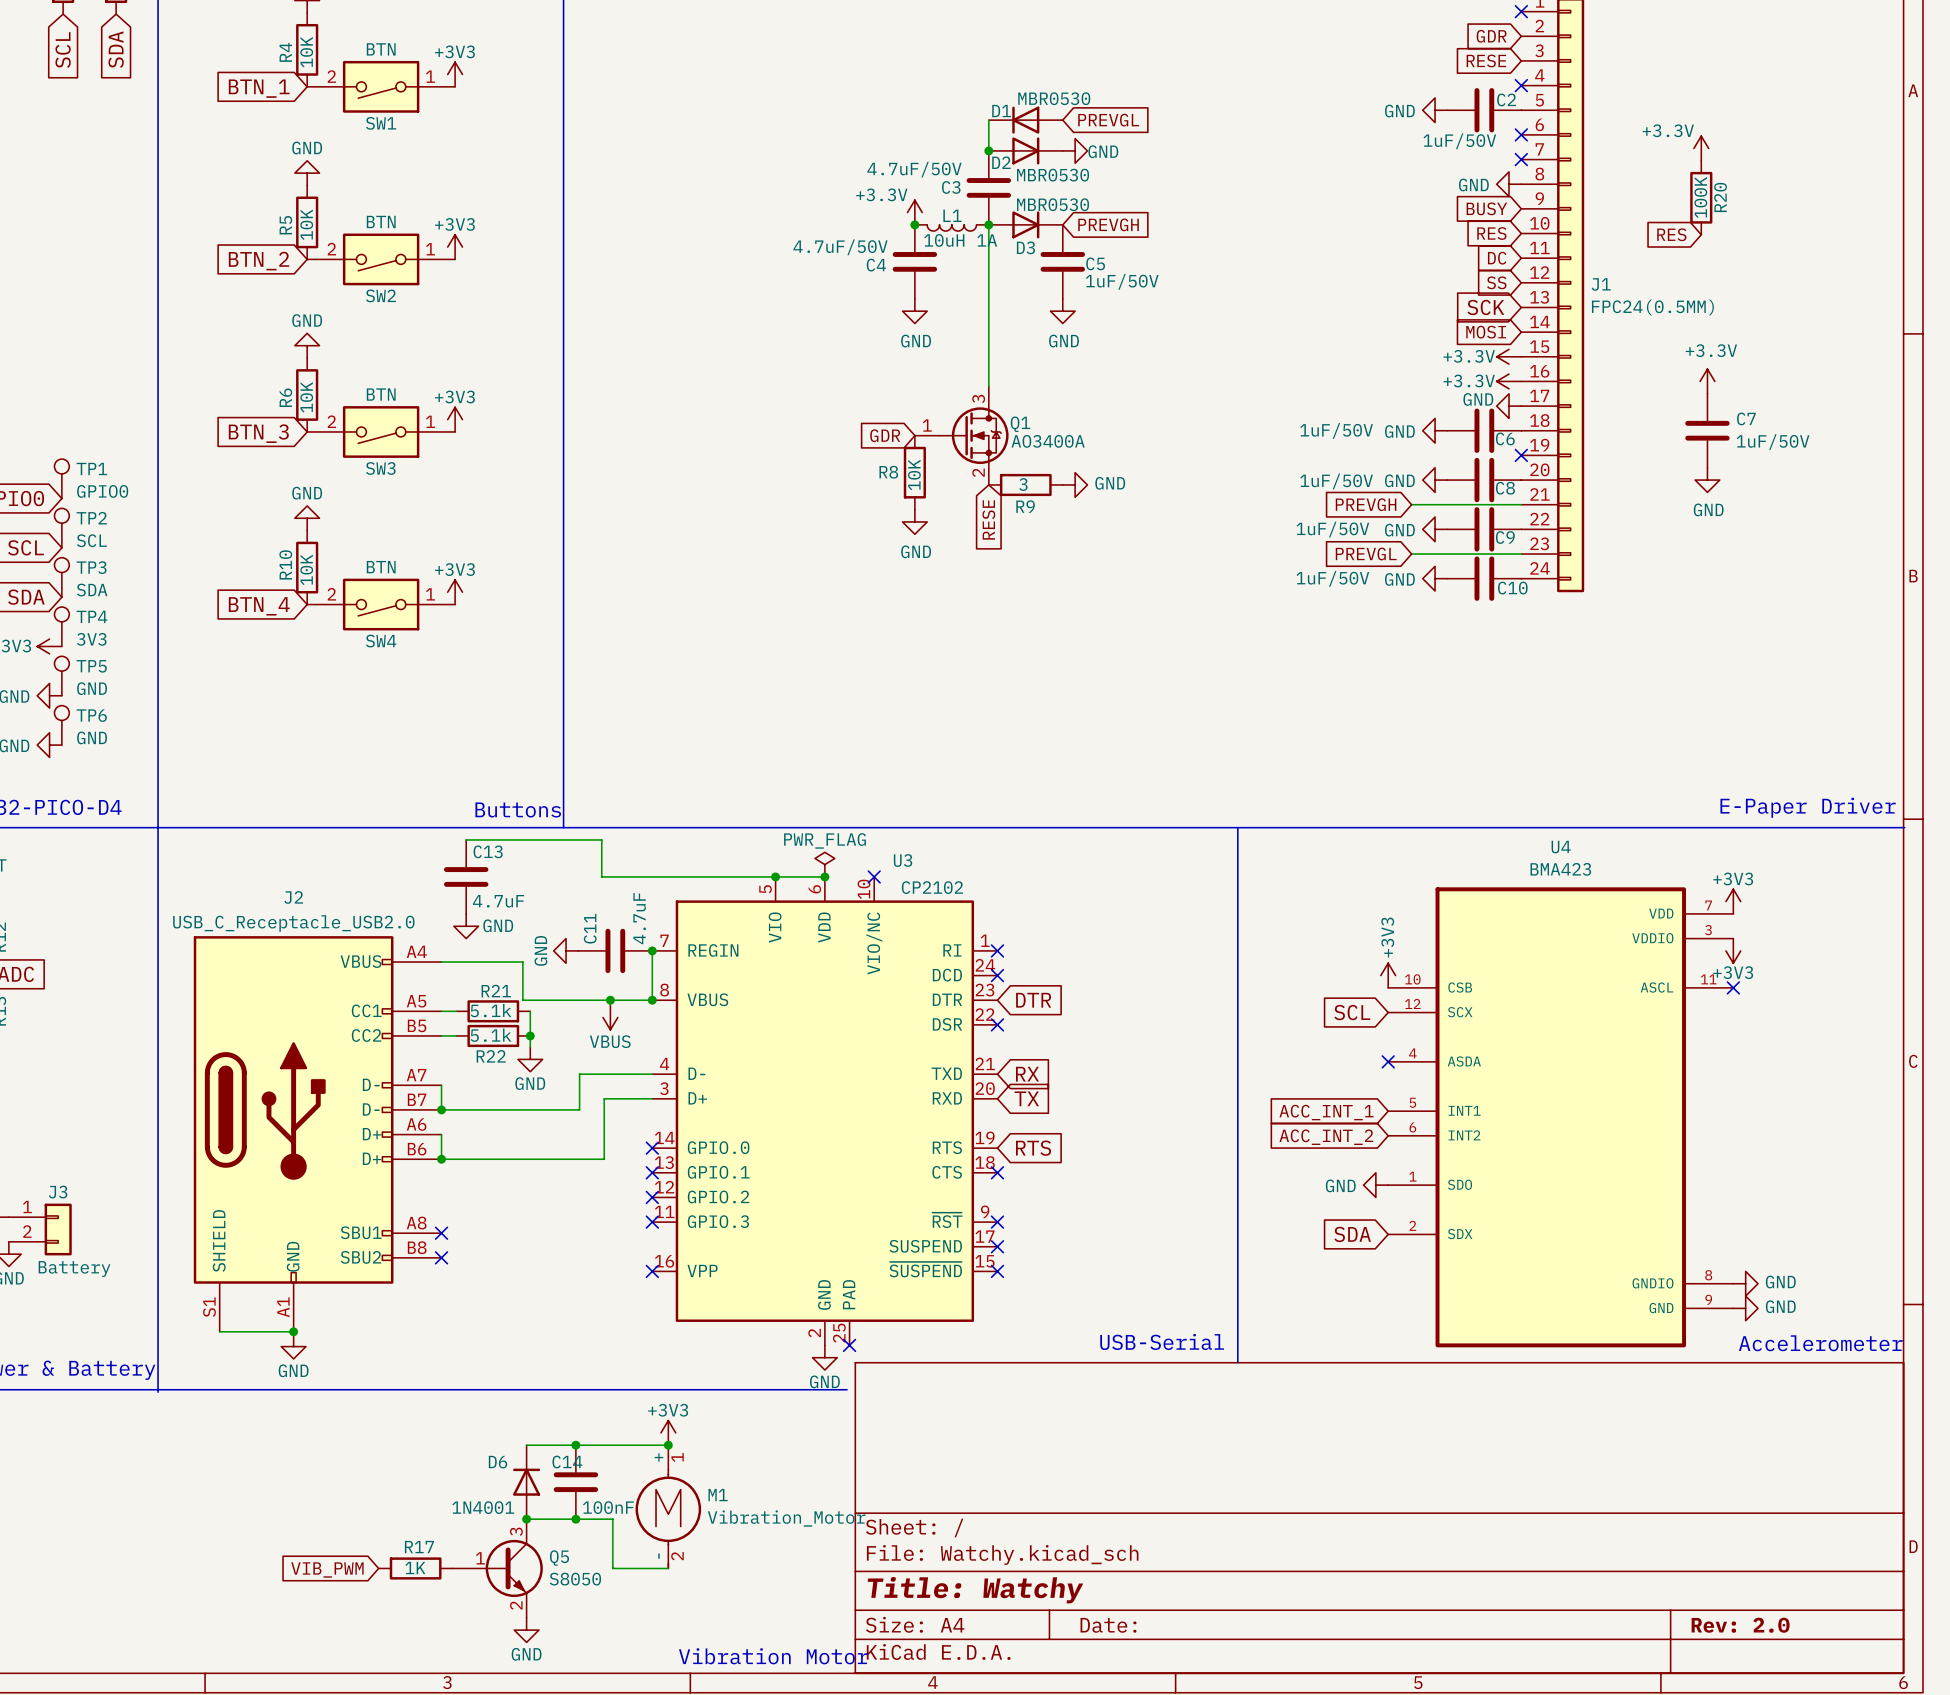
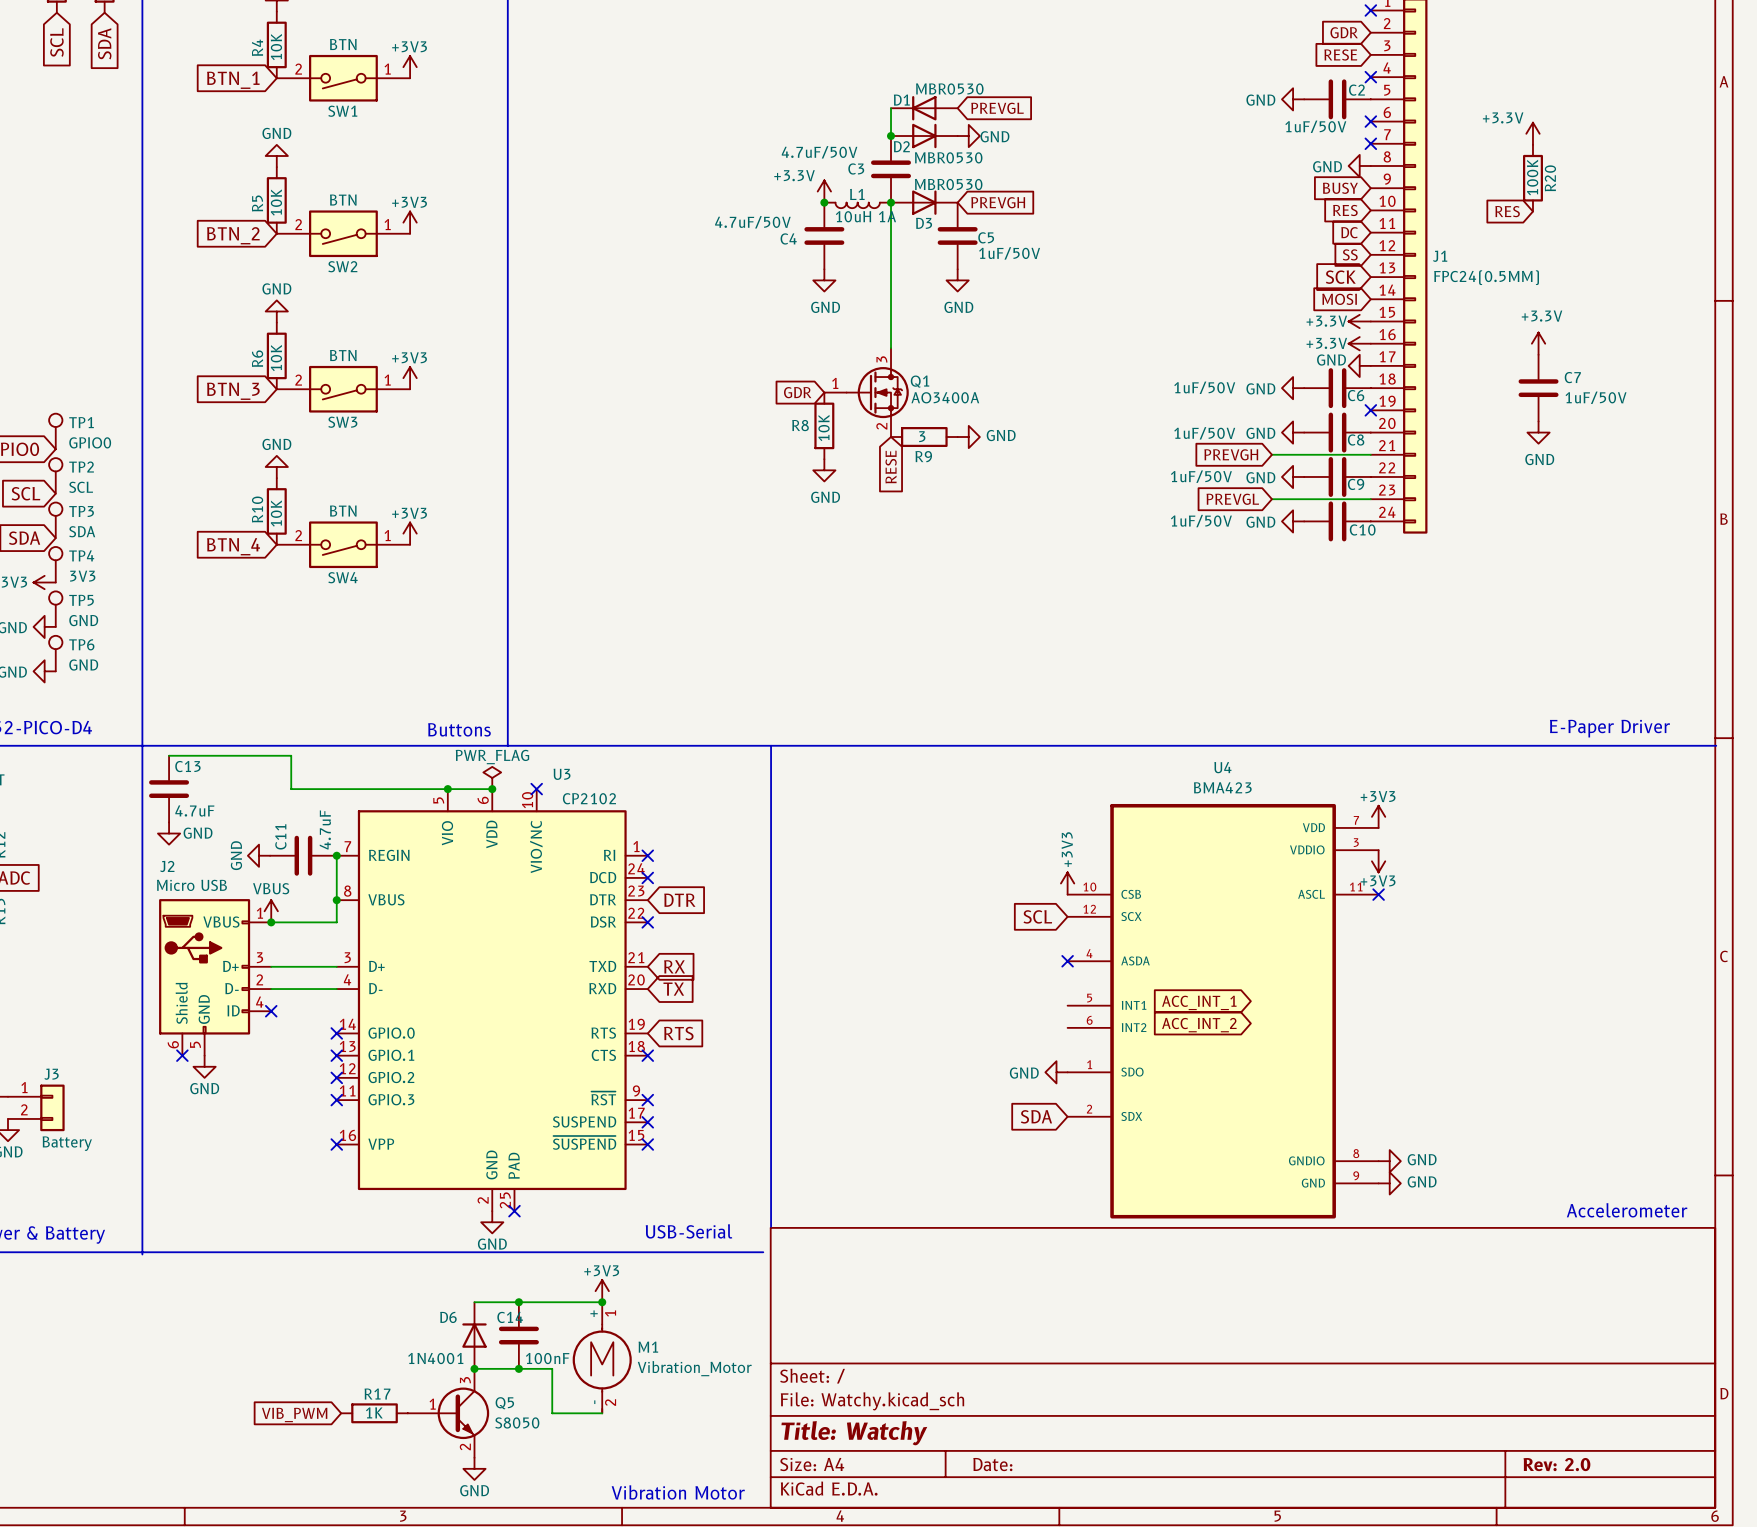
line: none -> (771, 745) (771, 1226)
line: (1237, 828) (1237, 1362) -> none
wire: none -> (169, 755) (291, 755) (291, 789) (492, 789)
wire: (466, 839) (601, 839) (601, 876) (824, 876) -> none
power symbol: none -> PWR_FLAG (492, 777)
power symbol: PWR_FLAG (824, 864) -> none
junction: none -> (447, 789)
junction: none -> (492, 789)
no-connect mark: none -> (536, 789)
C13 position: (466, 876) -> (169, 789)
junction: (775, 876) -> none
junction: (824, 876) -> none
no-connect mark: (874, 876) -> none
J2 name position: J2 (293, 897) -> J2 (167, 866)
power symbol: +3V3 (1733, 901) -> none
power symbol: none -> +3V3 (1378, 816)
J2 value: USB_C_Receptacle_USB2.0 (293, 923) -> Micro USB (191, 885)
power symbol: none -> GND (169, 833)
power symbol: GND (466, 926) -> none
J2 symbol: [193, 936, 442, 1332] -> [159, 899, 272, 1056]
power symbol: none -> GND (259, 855)
junction: none -> (336, 855)
no-connect mark: none -> (647, 855)
power symbol: GND (566, 950) -> none
C11 position: (615, 950) -> (303, 855)
junction: (652, 950) -> none
no-connect mark: (997, 950) -> none
power symbol: +3V3 (1733, 950) -> none
power symbol: none -> +3V3 (1378, 861)
no-connect mark: none -> (647, 877)
no-connect mark: (997, 975) -> none
power symbol: +3V3 (1388, 975) -> none
power symbol: none -> +3V3 (1067, 883)
no-connect mark: (1733, 987) -> none
no-connect mark: none -> (1378, 894)
junction: none -> (336, 900)
global label: none -> DTR (679, 900)
junction: (610, 1000) -> none
junction: (652, 1000) -> none
global label: DTR (1033, 1000) -> none
power symbol: none -> VBUS (271, 911)
R21: 5.1k (493, 1011) -> none
global label position: SCL (1352, 1012) -> SCL (1037, 916)
power symbol: VBUS (610, 1017) -> none
junction: none -> (271, 922)
no-connect mark: none -> (647, 922)
no-connect mark: (997, 1024) -> none
R22: 5.1k (493, 1035) -> none
junction: (530, 1035) -> none
power symbol: GND (530, 1059) -> none
no-connect mark: (1388, 1061) -> none
U3 pin number: 4 (664, 1064) -> 3 (347, 957)
no-connect mark: none -> (1067, 961)
global label: none -> RX (674, 966)
U3 pin name: D- (696, 1073) -> D+ (376, 966)
global label: RX (1027, 1074) -> none
U3 pin number: 3 (664, 1088) -> 4 (347, 979)
global label: none -> TX (673, 989)
U3 pin name: D+ (697, 1098) -> D- (375, 988)
global label: TX (1026, 1098) -> none
junction: (441, 1109) -> none
U3 position: (824, 1111) -> (492, 1000)
U4 position: (1560, 1117) -> (1223, 1011)
no-connect mark: none -> (271, 1011)
no-connect mark: none -> (336, 1033)
global label: none -> RTS (678, 1033)
no-connect mark: (652, 1148) -> none
global label: RTS (1033, 1148) -> none
junction: (441, 1159) -> none
no-connect mark: none -> (182, 1055)
no-connect mark: none -> (336, 1055)
no-connect mark: none -> (647, 1055)
no-connect mark: (652, 1172) -> none
no-connect mark: (997, 1172) -> none
power symbol: none -> GND (204, 1066)
power symbol: GND (1375, 1185) -> none
power symbol: none -> GND (1056, 1072)
no-connect mark: none -> (336, 1077)
no-connect mark: (652, 1197) -> none
no-connect mark: none -> (336, 1100)
no-connect mark: none -> (647, 1100)
no-connect mark: (652, 1222) -> none
no-connect mark: (997, 1222) -> none
no-connect mark: (441, 1233) -> none
global label position: SDA (1352, 1234) -> SDA (1036, 1116)
no-connect mark: none -> (647, 1122)
no-connect mark: (997, 1246) -> none
no-connect mark: (441, 1257) -> none
no-connect mark: none -> (336, 1144)
no-connect mark: none -> (647, 1144)
no-connect mark: (652, 1271) -> none
no-connect mark: (997, 1271) -> none
power symbol: GND (1745, 1283) -> none
power symbol: none -> GND (1389, 1161)
power symbol: GND (1745, 1308) -> none
power symbol: none -> GND (1389, 1183)
wire: (219, 1331) (293, 1331) (293, 1334) -> none
junction: (293, 1331) -> none
text: USB-Serial (1162, 1341) -> none
no-connect mark: none -> (514, 1211)
no-connect mark: (849, 1345) -> none
power symbol: GND (293, 1346) -> none
power symbol: none -> GND (492, 1222)
power symbol: GND (824, 1357) -> none
text: none -> USB-Serial (689, 1231)

